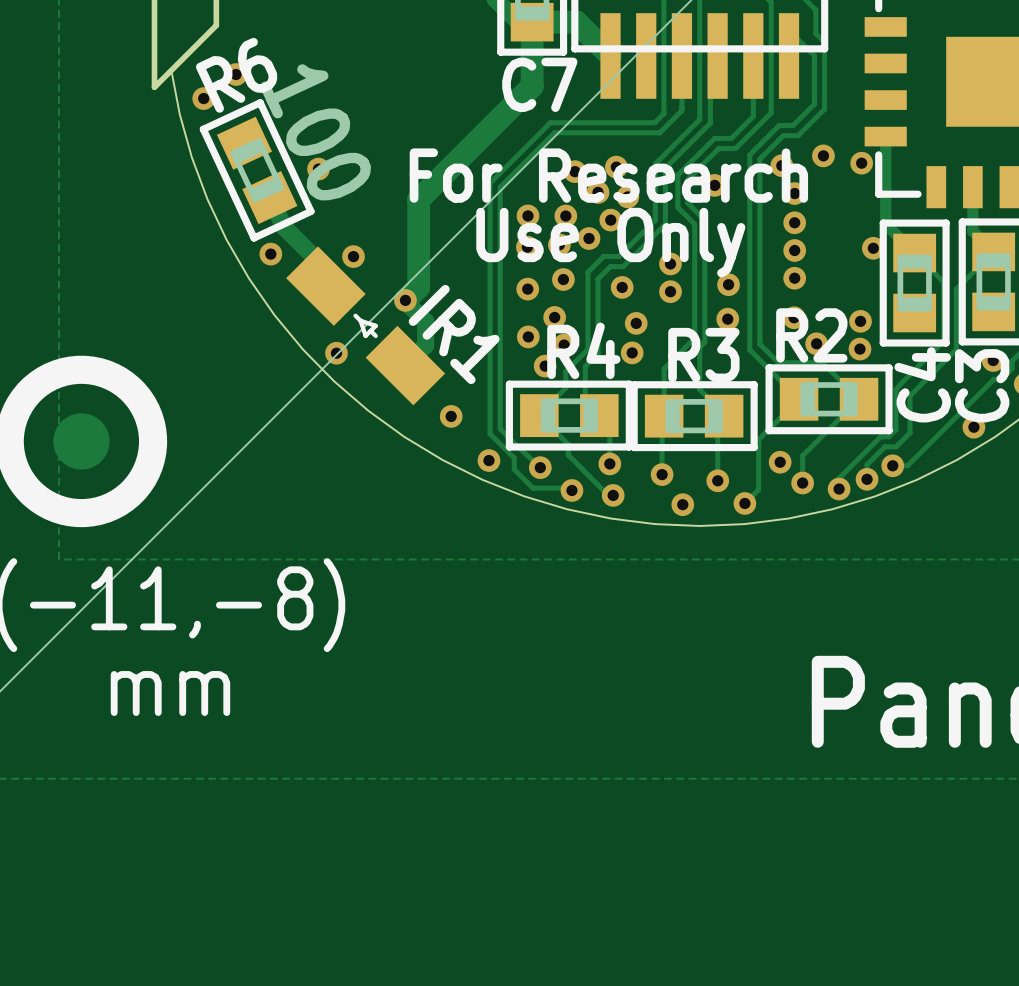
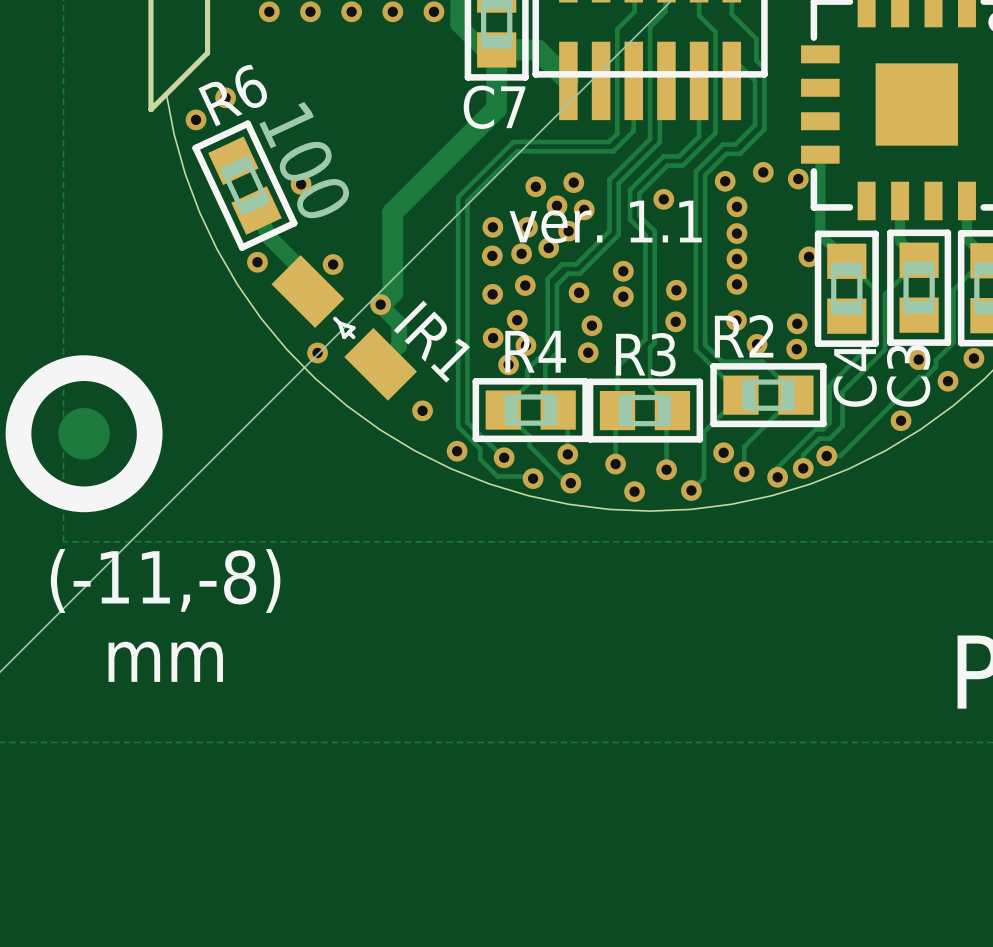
text: For Research (608, 175) -> none
text: none -> ver. 1.1 (605, 221)
text: Use Only (610, 242) -> none

